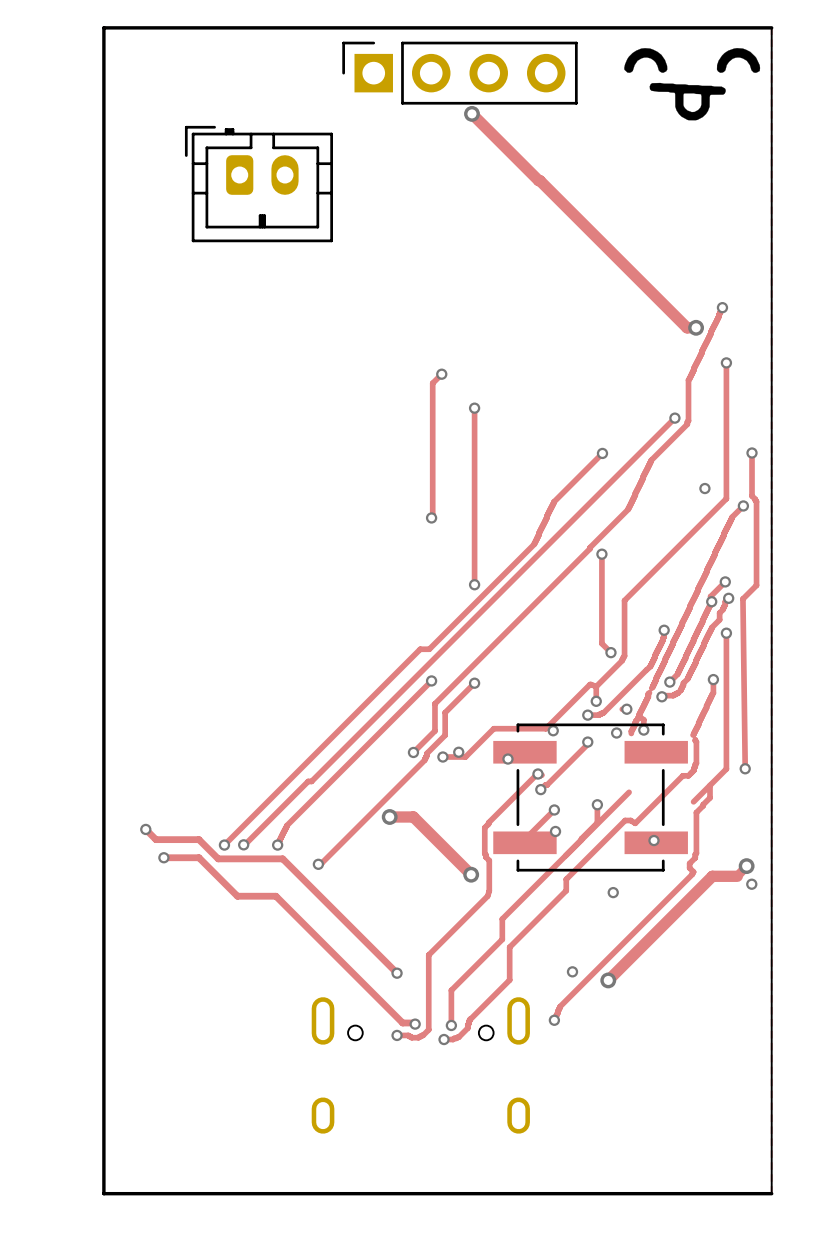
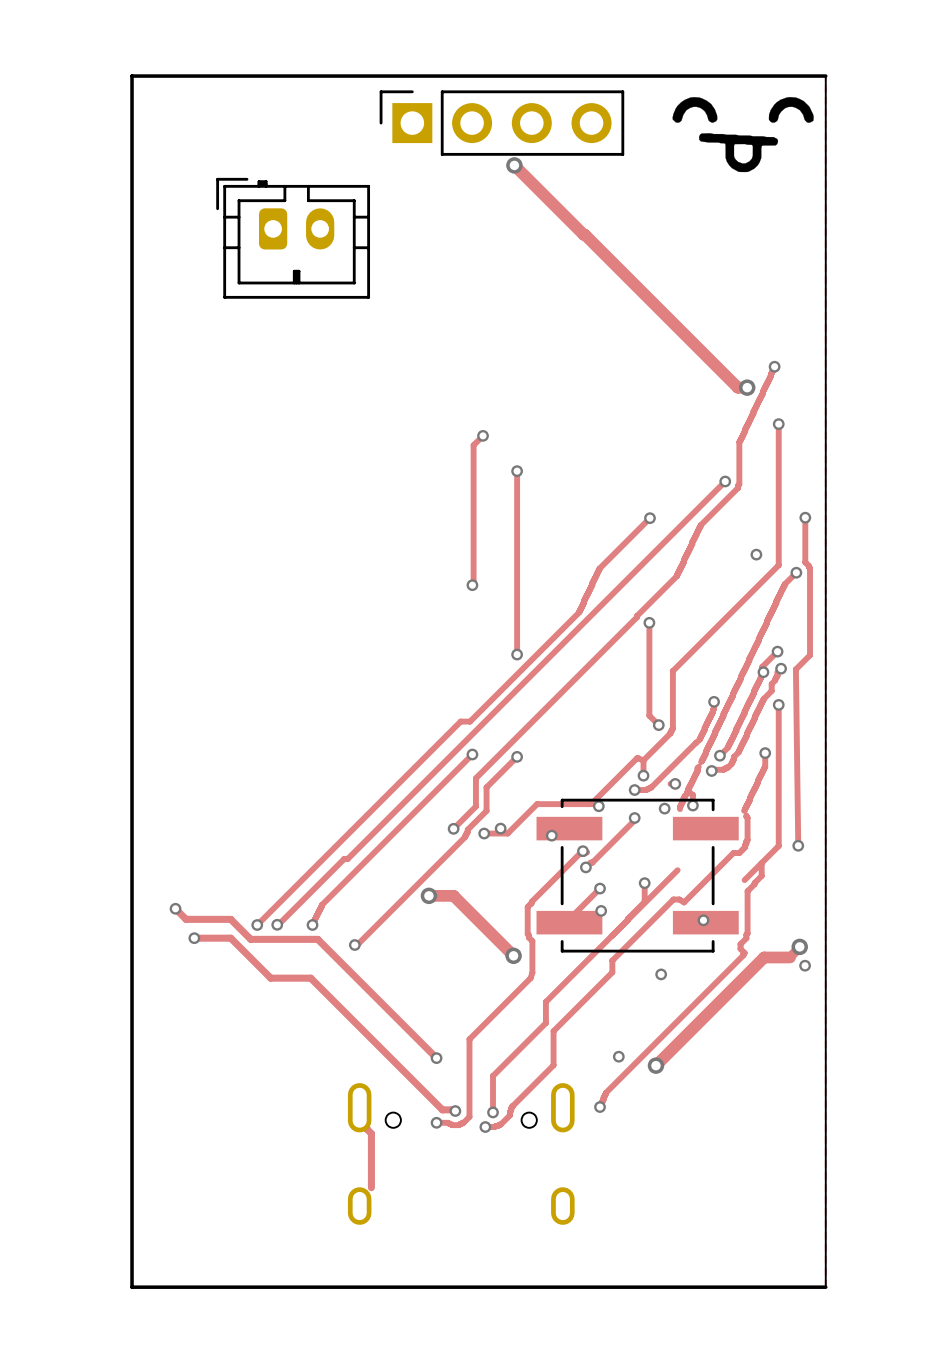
track: none -> (359, 1107) (359, 1120) (371, 1133) (371, 1187)

